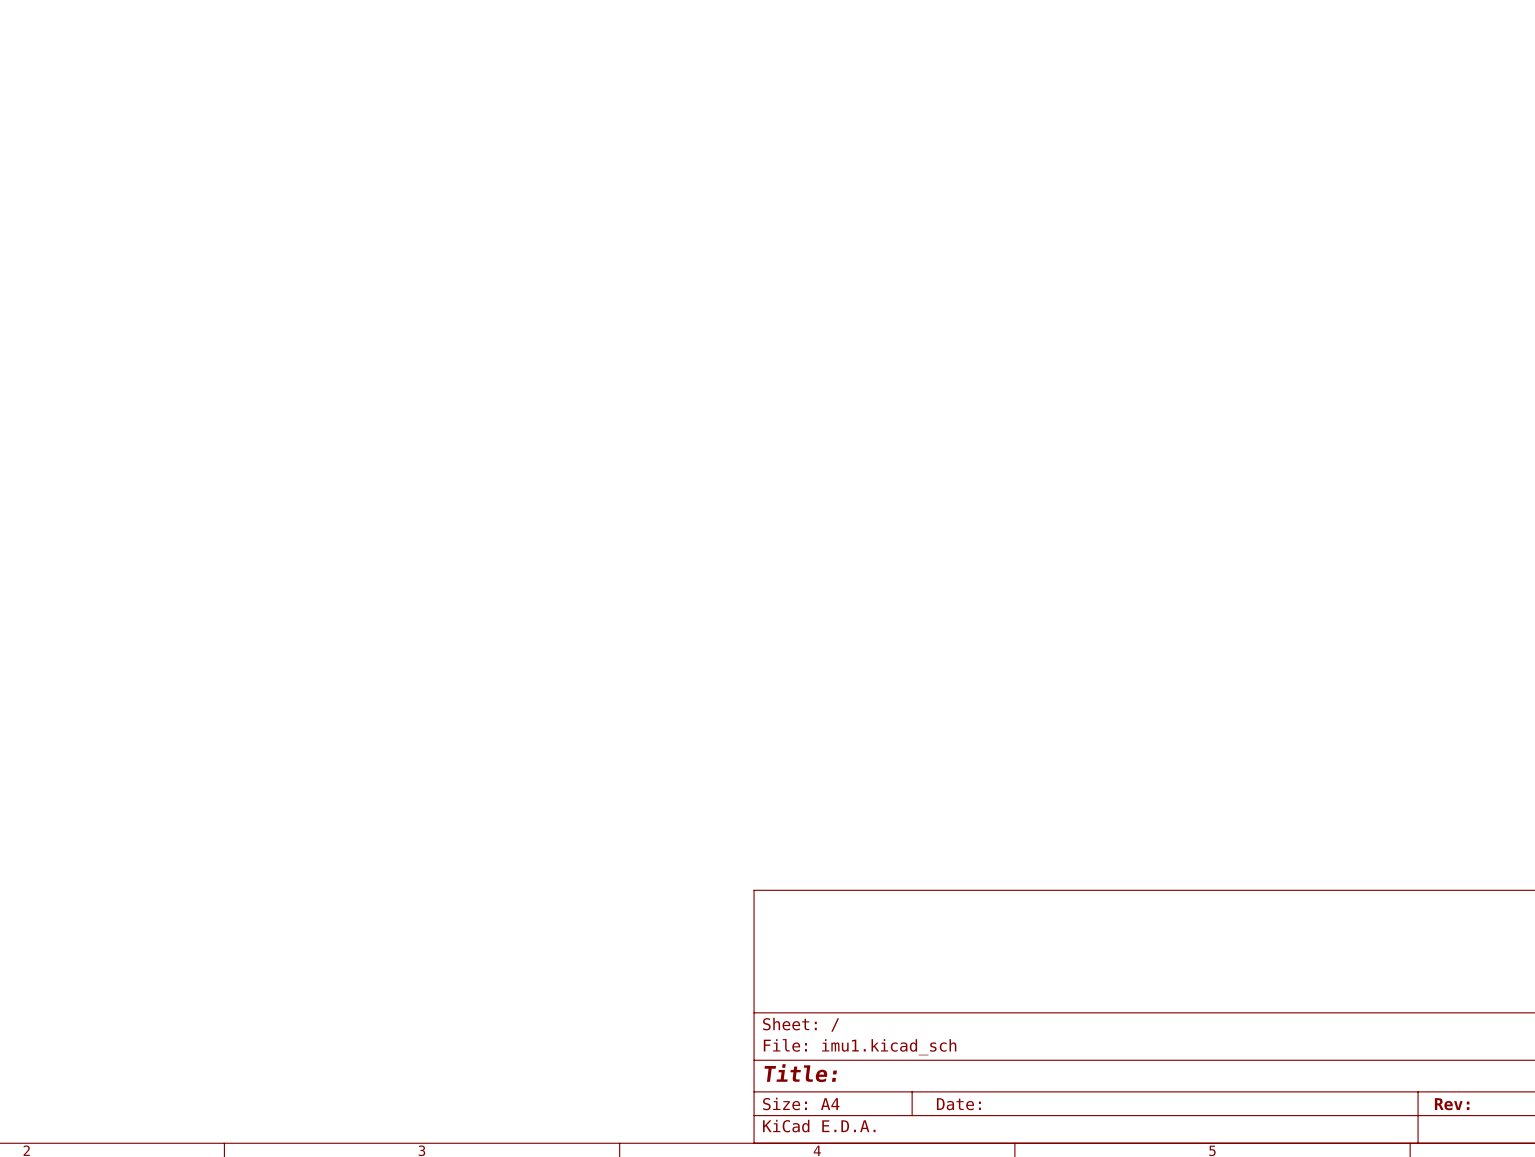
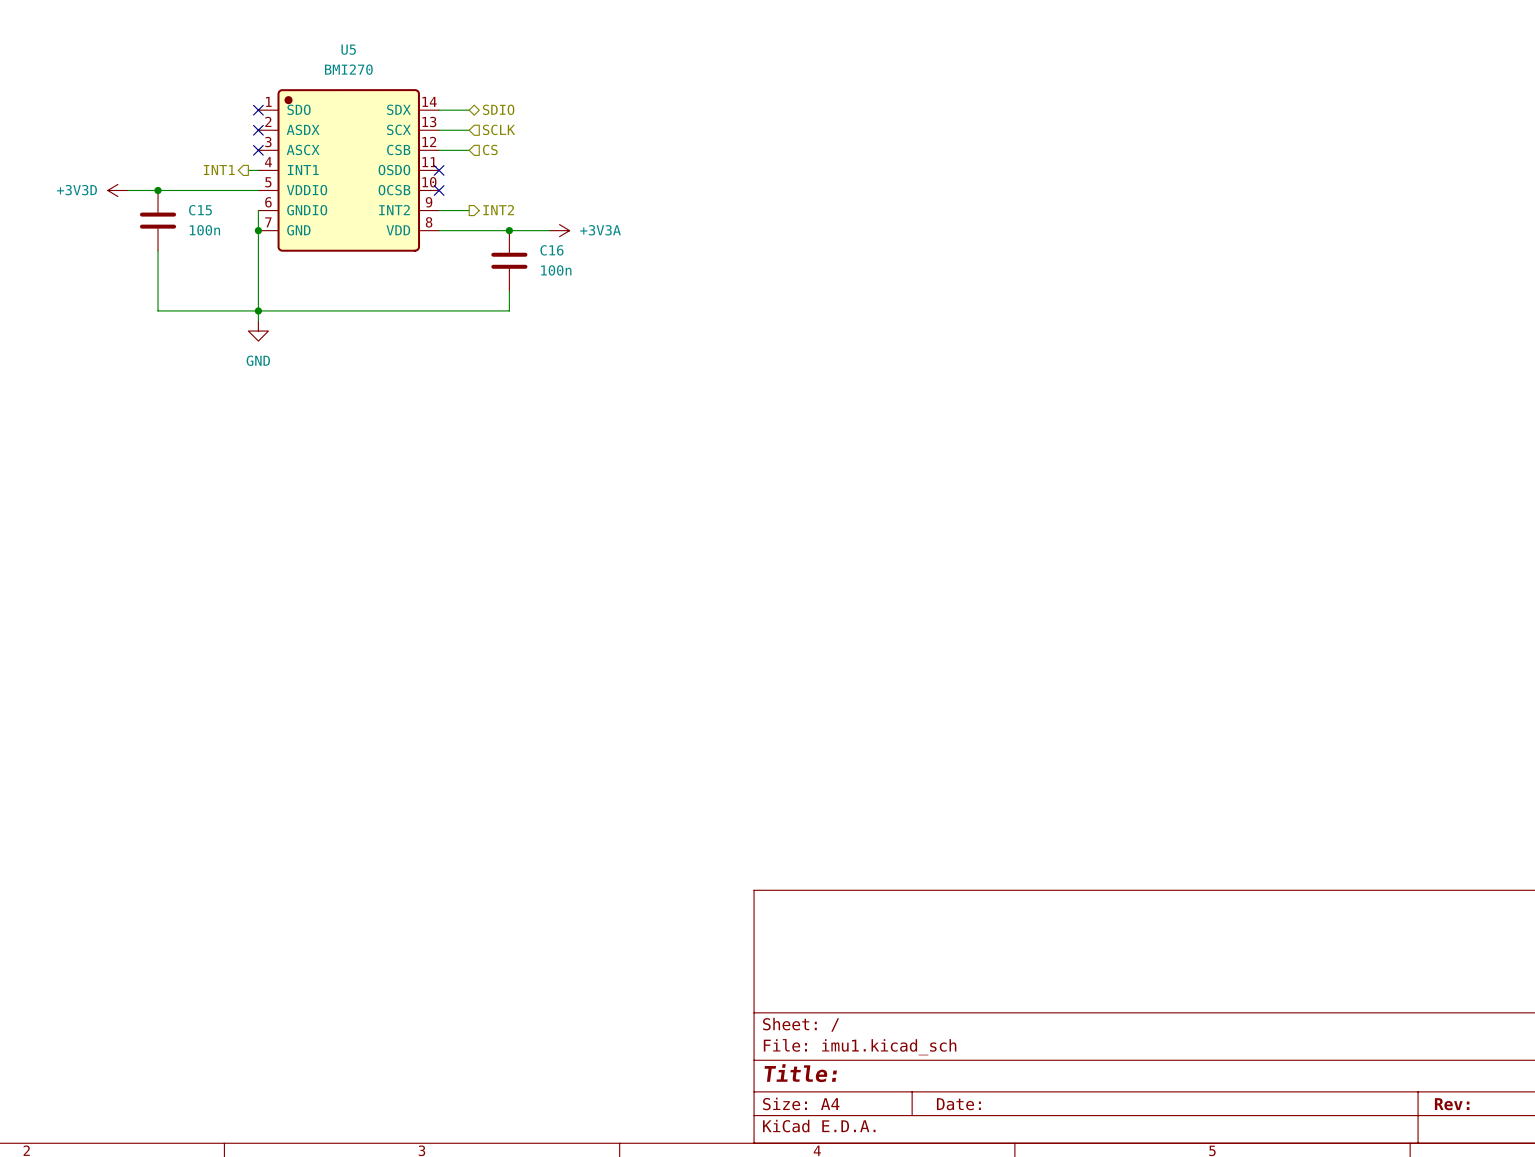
hierarchical label: none -> SDIO (498, 109)
no-connect mark: none -> (258, 110)
wire: none -> (439, 110) (469, 110)
hierarchical label: none -> SCLK (499, 129)
no-connect mark: none -> (258, 130)
wire: none -> (439, 130) (469, 130)
hierarchical label: none -> CS (490, 149)
no-connect mark: none -> (258, 150)
wire: none -> (439, 150) (469, 150)
hierarchical label: none -> INT1 (219, 170)
wire: none -> (248, 170) (258, 170)
U5: none -> BMI270 (348, 170)
no-connect mark: none -> (439, 170)
power symbol: none -> +3V3D (117, 190)
wire: none -> (127, 190) (258, 190)
junction: none -> (158, 190)
no-connect mark: none -> (439, 190)
wire: none -> (258, 210) (258, 321)
wire: none -> (439, 210) (469, 210)
hierarchical label: none -> INT2 (498, 210)
C15: none -> 100n (158, 220)
junction: none -> (258, 230)
wire: none -> (439, 230) (549, 230)
junction: none -> (509, 230)
power symbol: none -> +3V3A (559, 230)
wire: none -> (158, 250) (158, 310) (509, 310) (509, 290)
C16: none -> 100n (509, 260)
junction: none -> (258, 310)
power symbol: none -> GND (258, 331)

